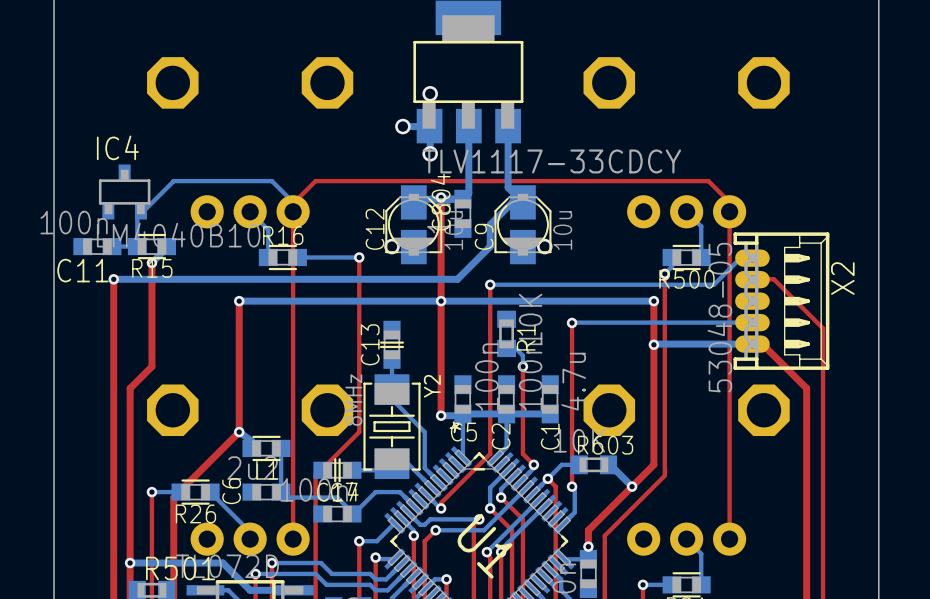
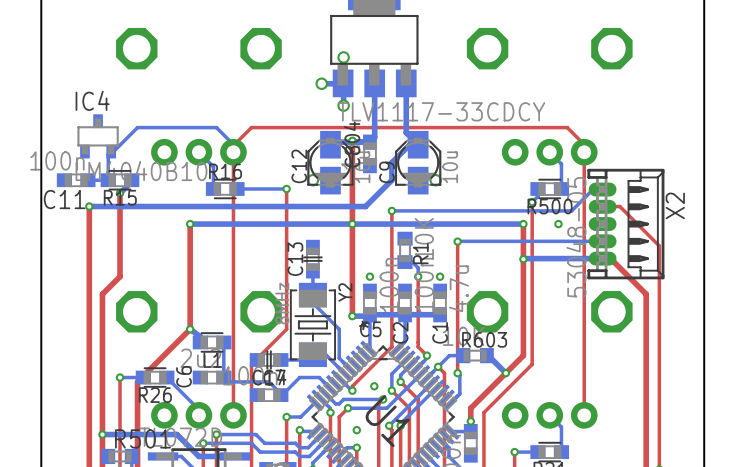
via: none -> (558, 224)
via: none -> (369, 276)
via: none -> (440, 276)
via: none -> (374, 386)
via: none -> (356, 430)

